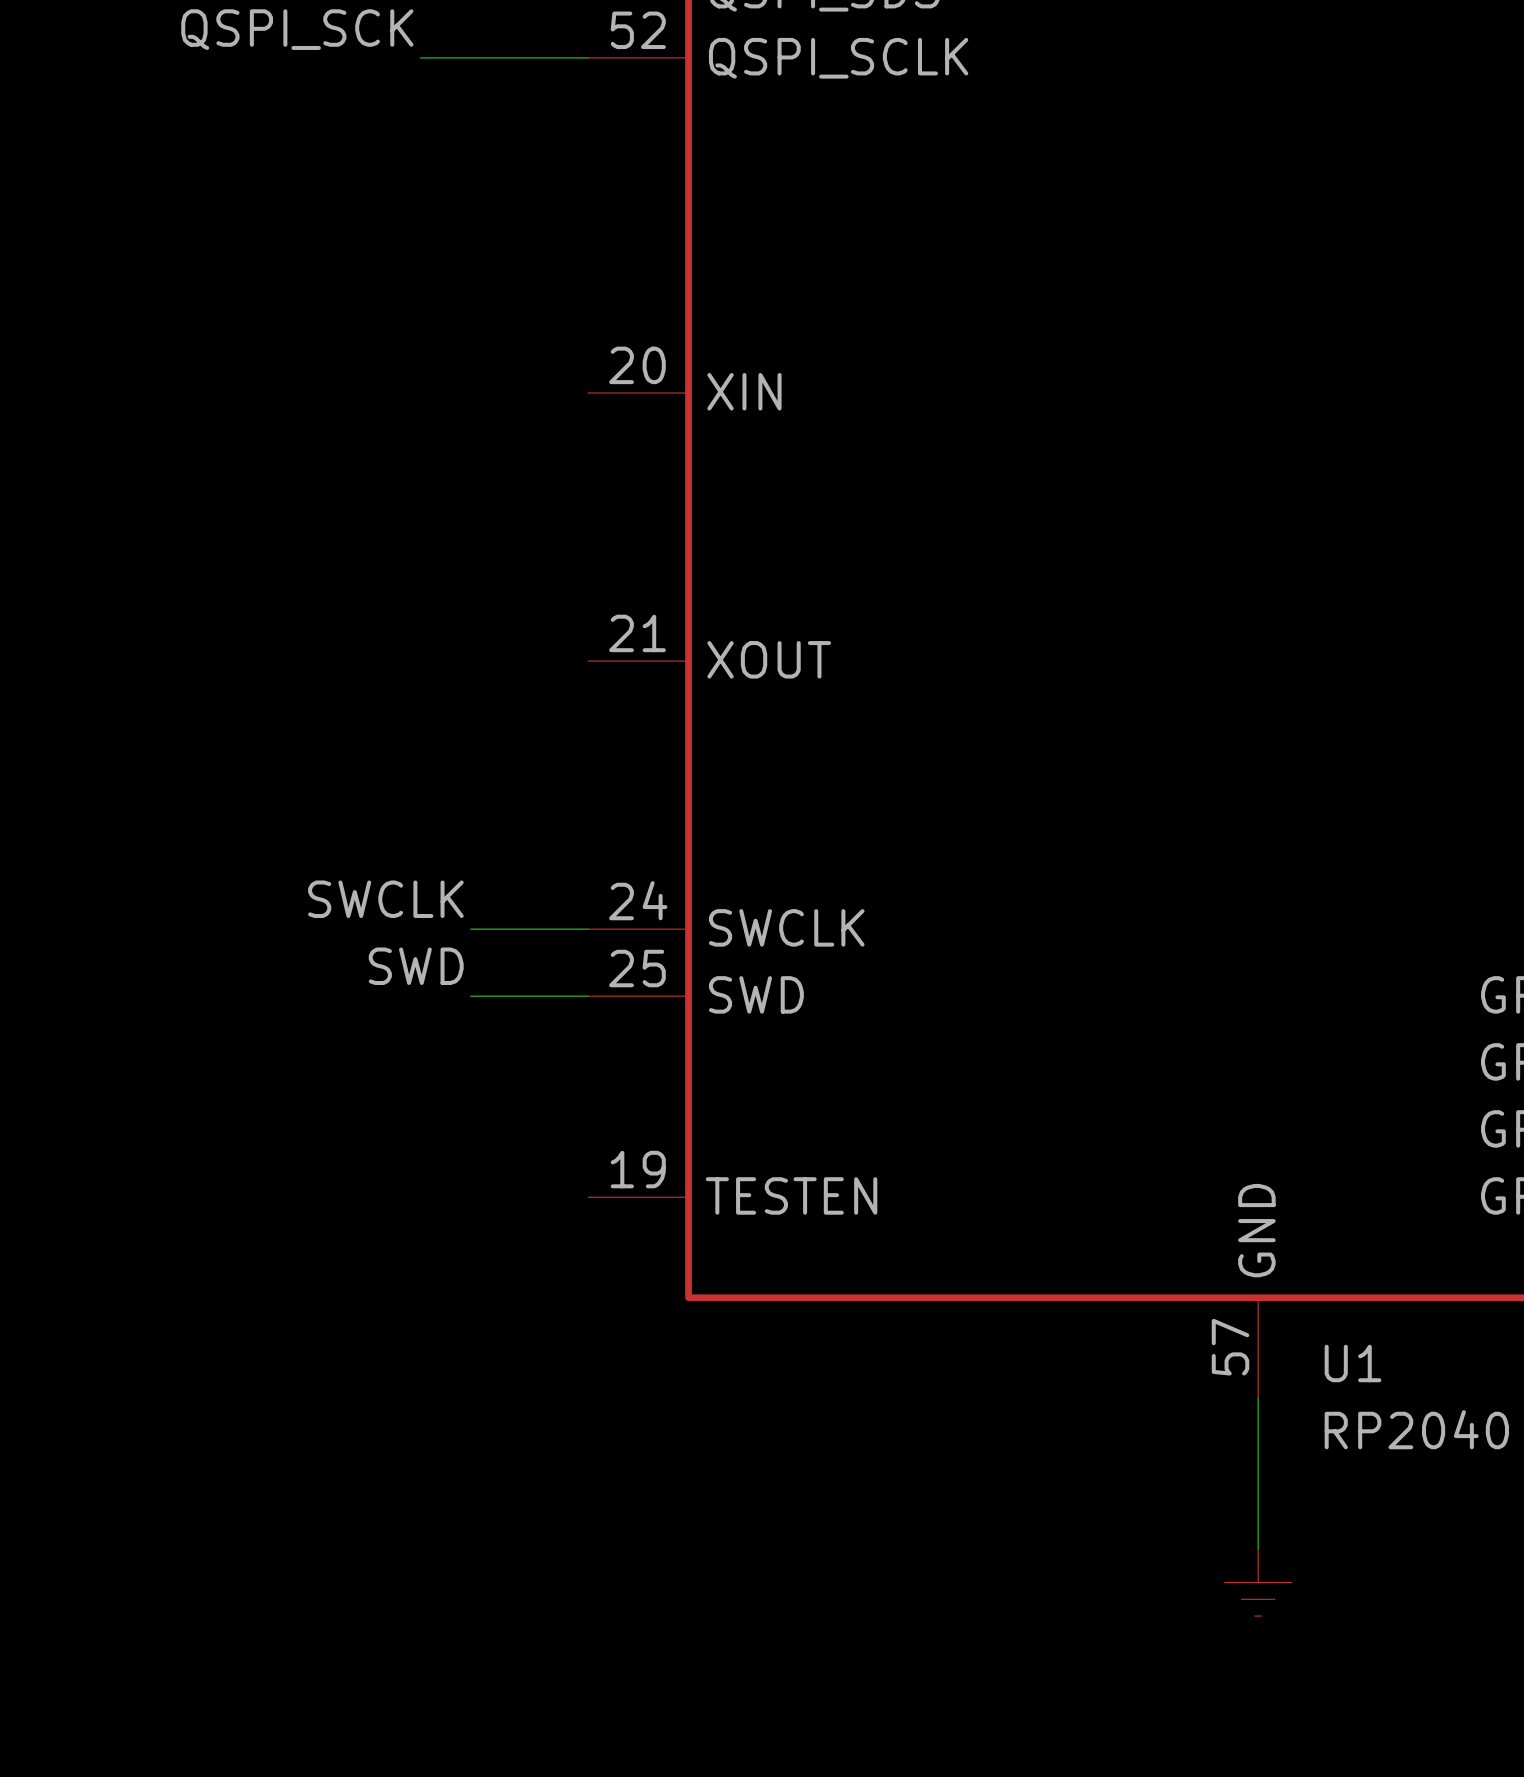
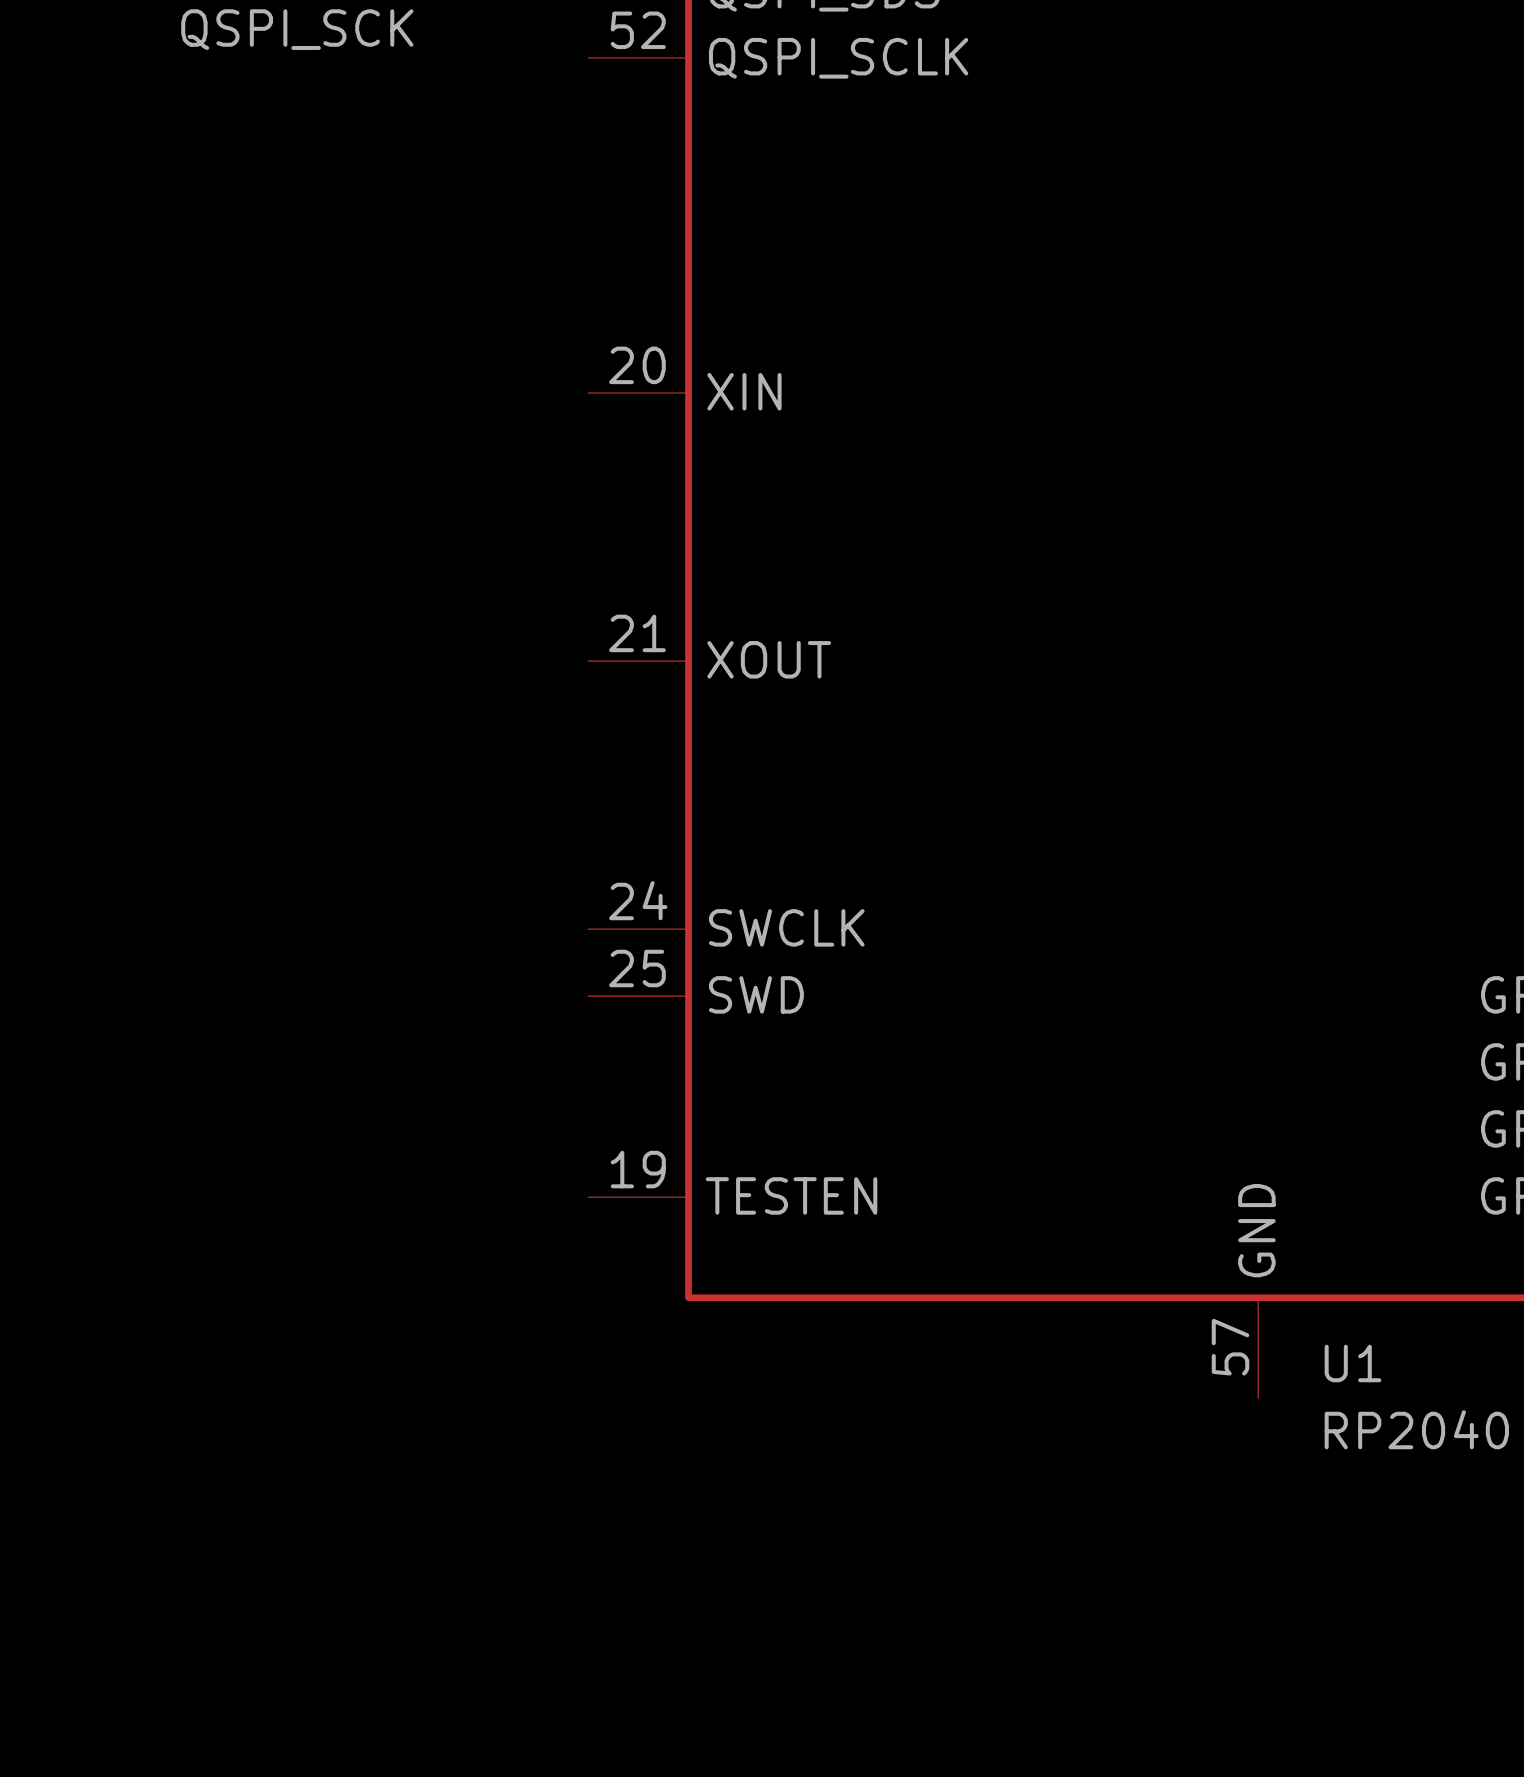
wire: (420, 57) (587, 57) -> none
label: SWCLK (385, 899) -> none
wire: (470, 929) (587, 929) -> none
label: SWD (416, 966) -> none
wire: (470, 996) (587, 996) -> none
wire: (1258, 1398) (1258, 1549) -> none
power symbol: (1258, 1582) -> none

